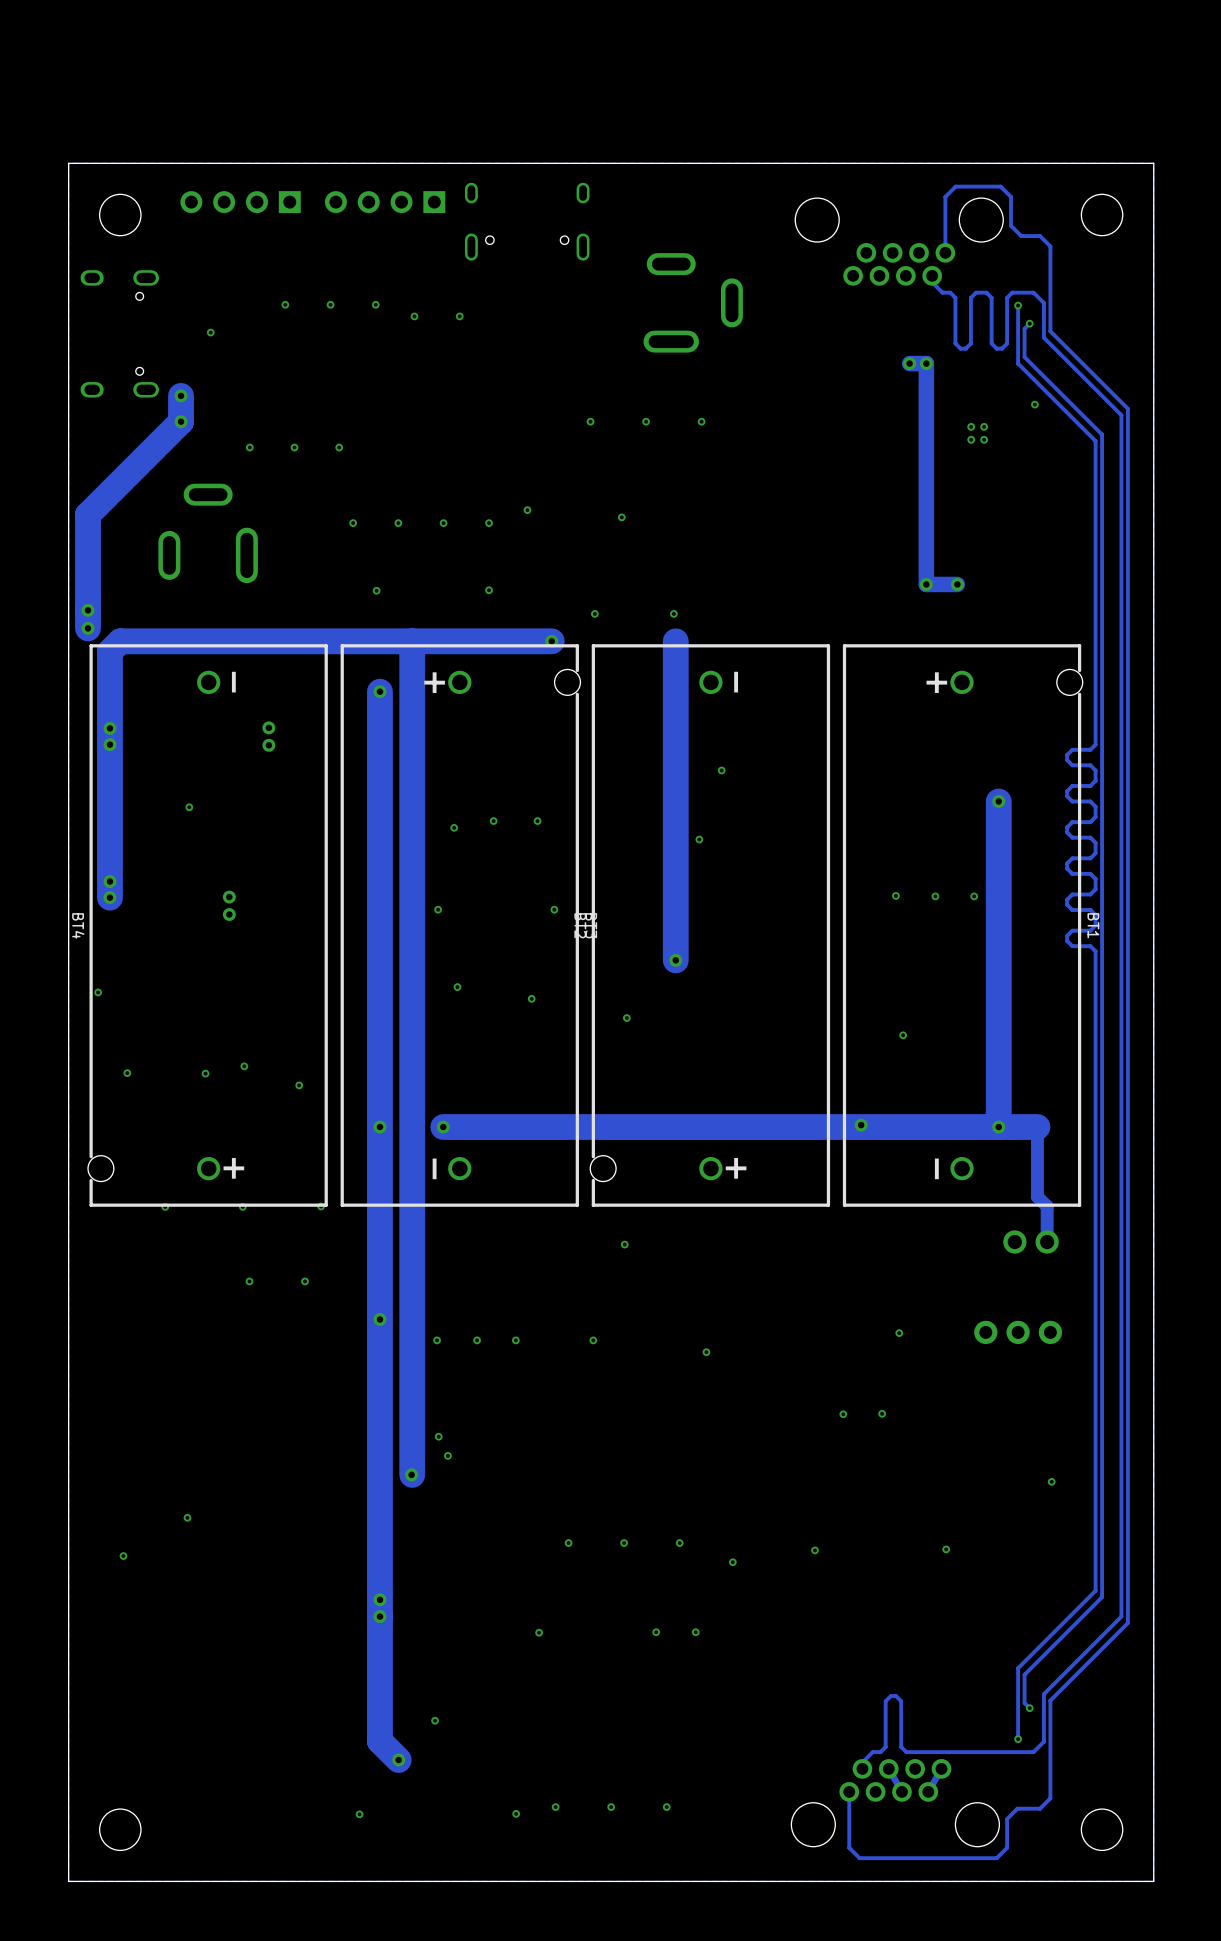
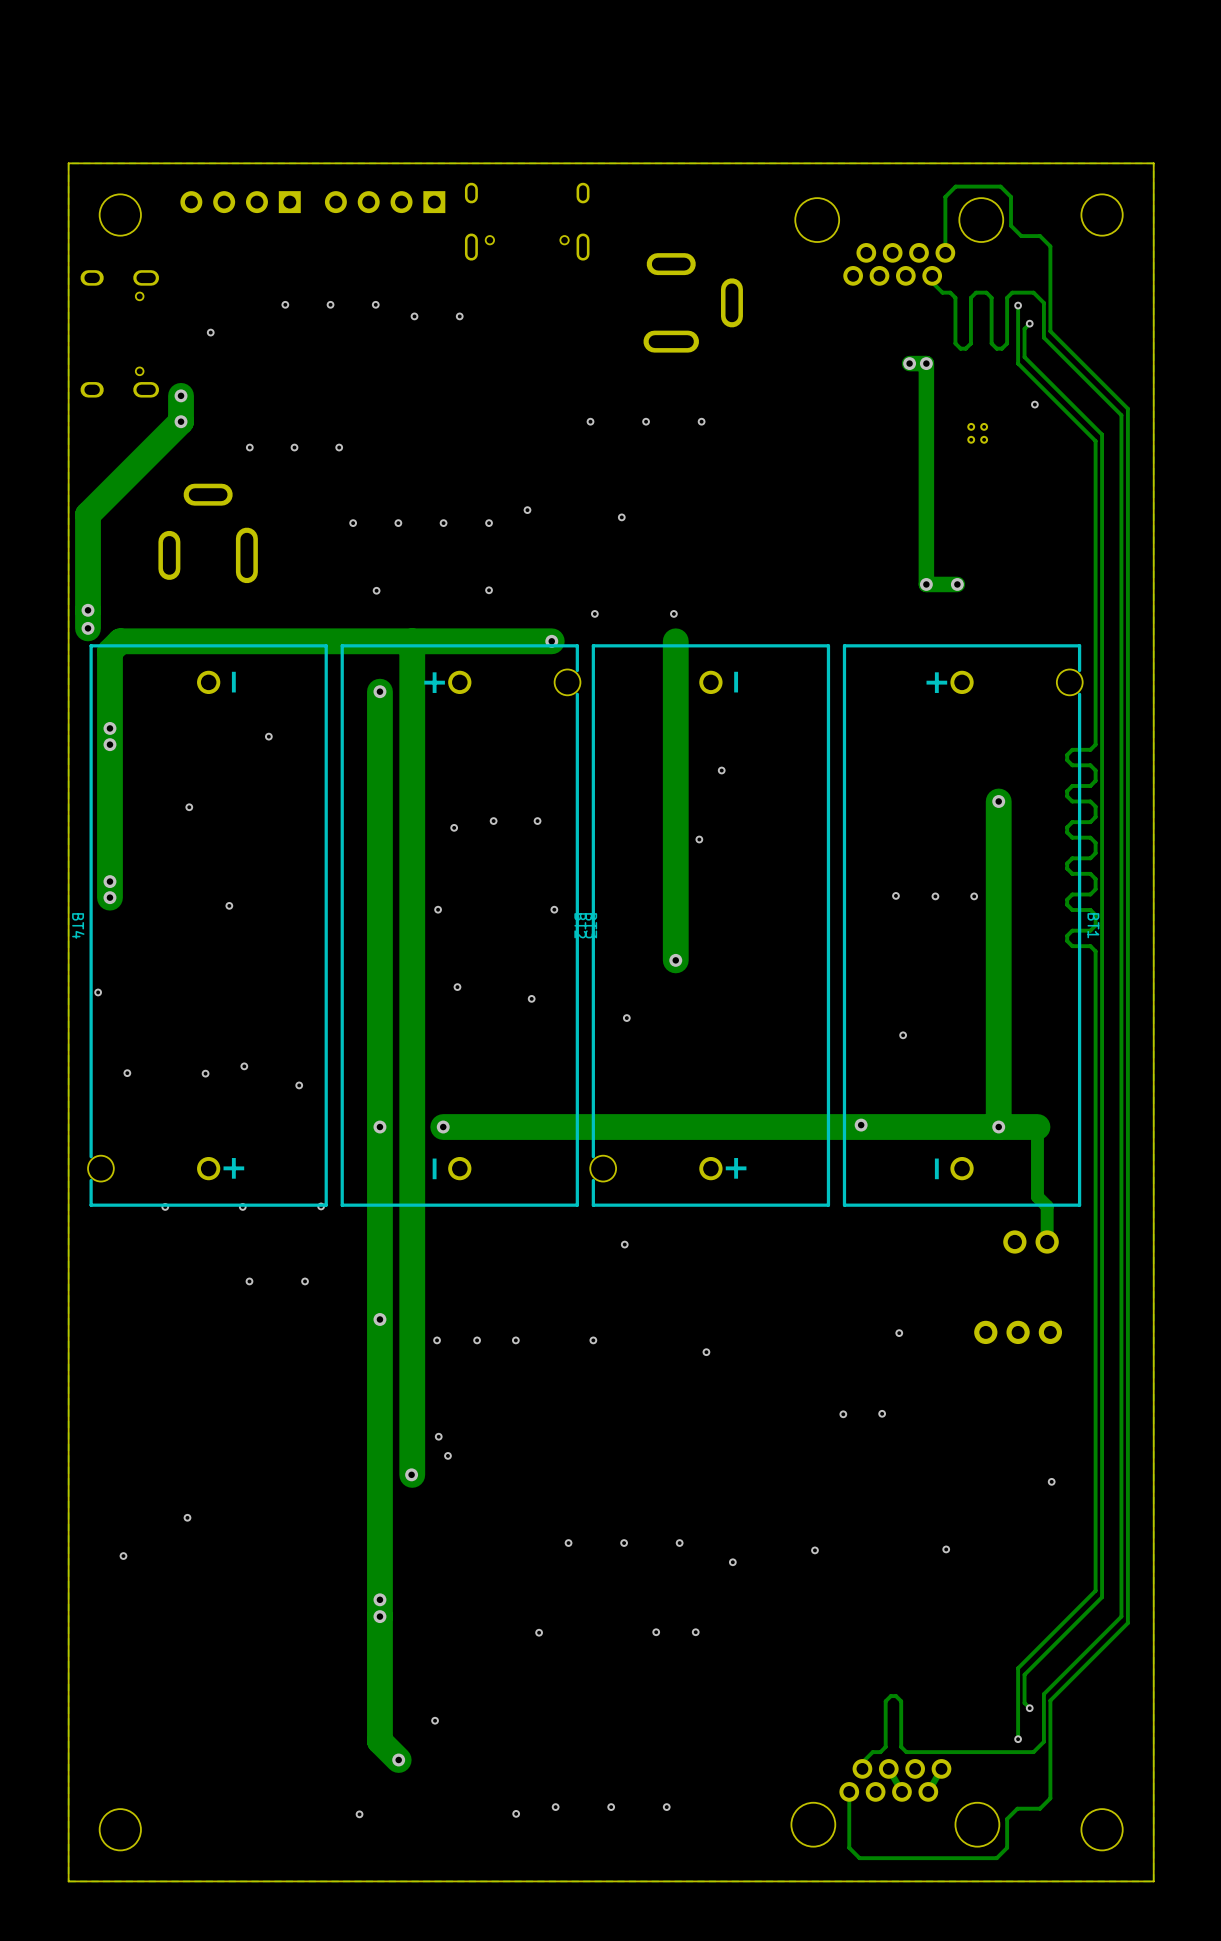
via: (268, 727) -> none
via: none -> (268, 736)
via: (268, 745) -> none
via: (229, 897) -> none
via: none -> (229, 905)
via: (229, 914) -> none

